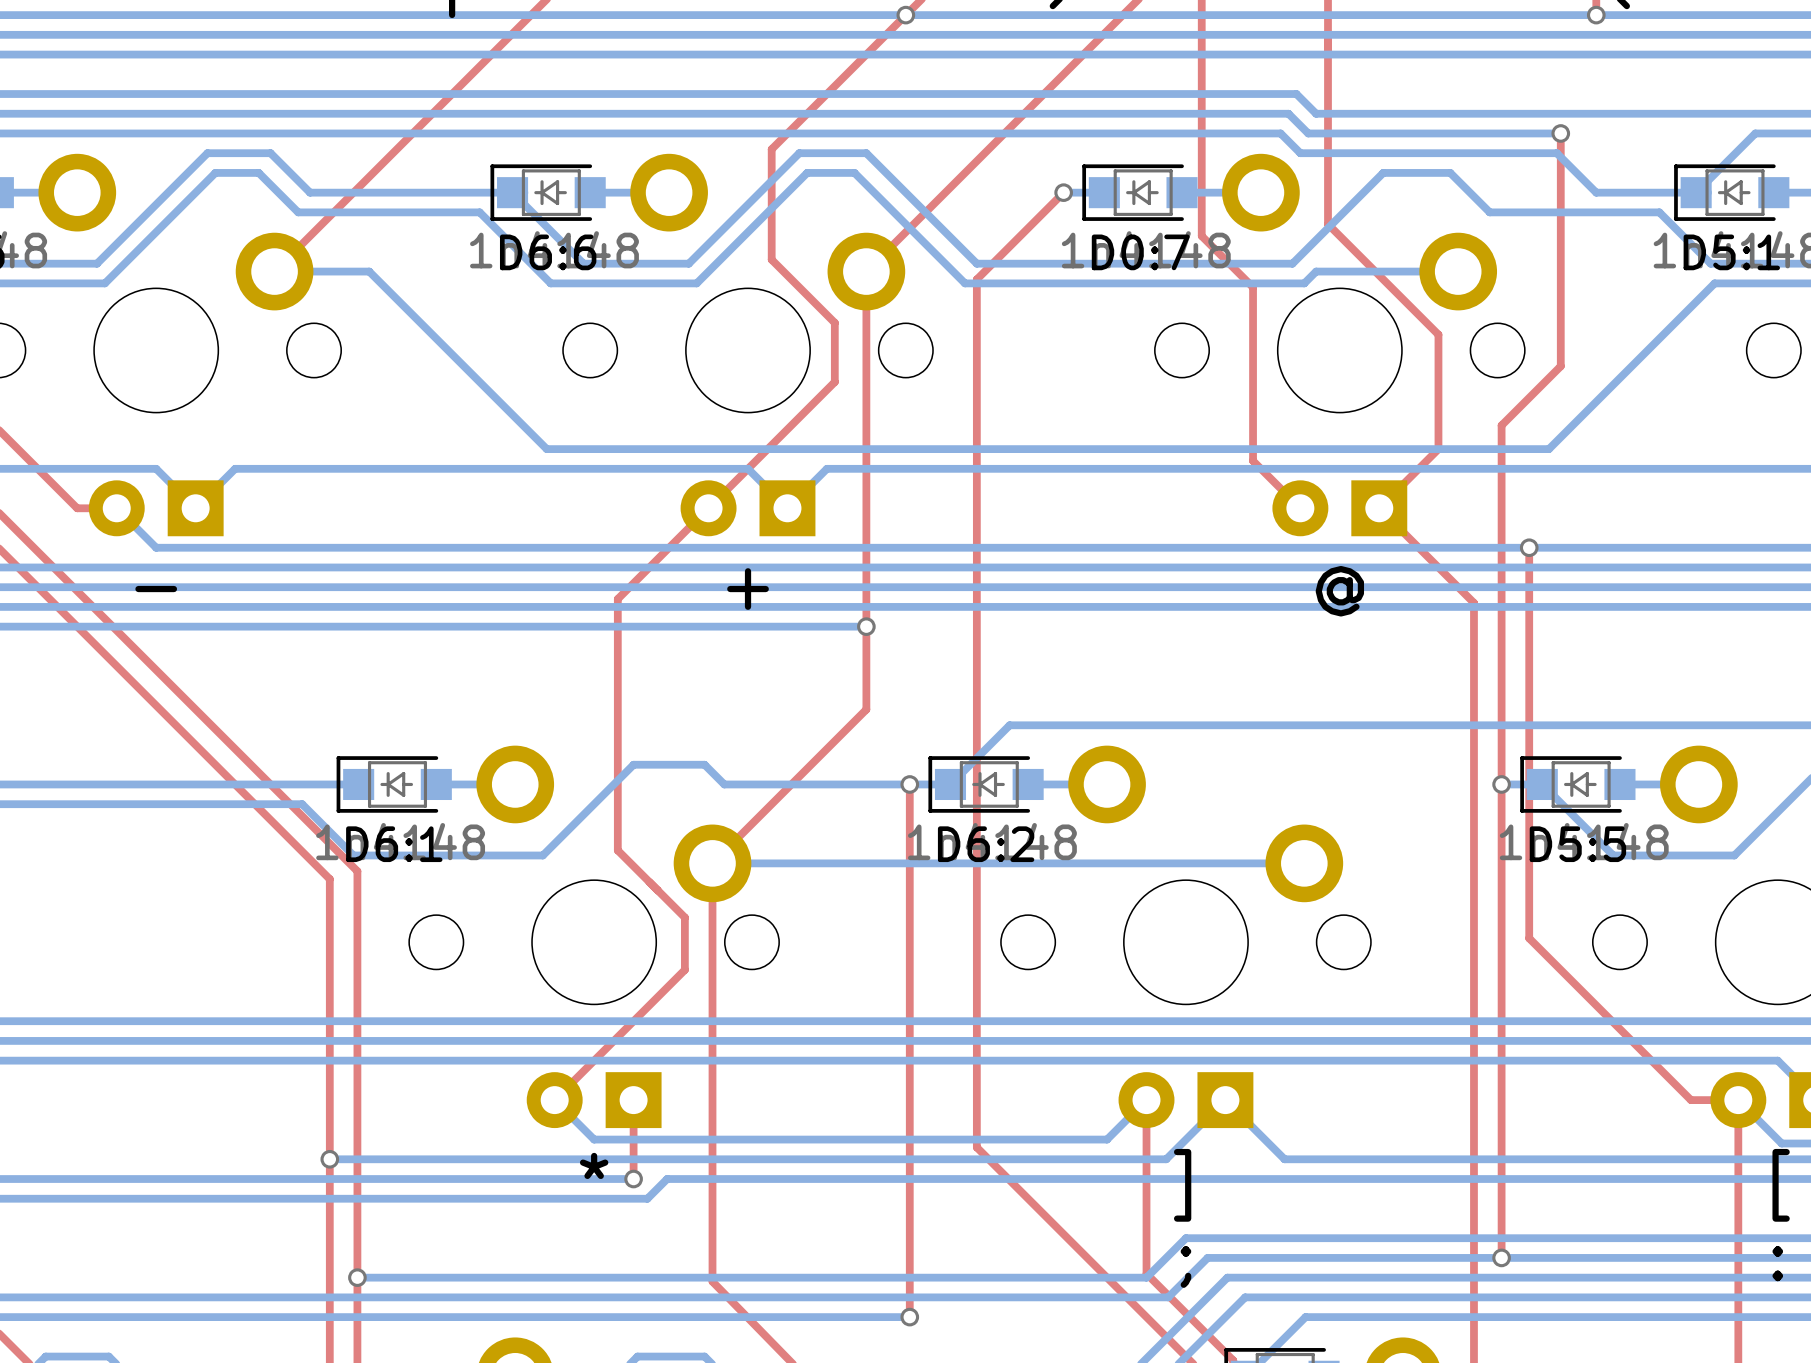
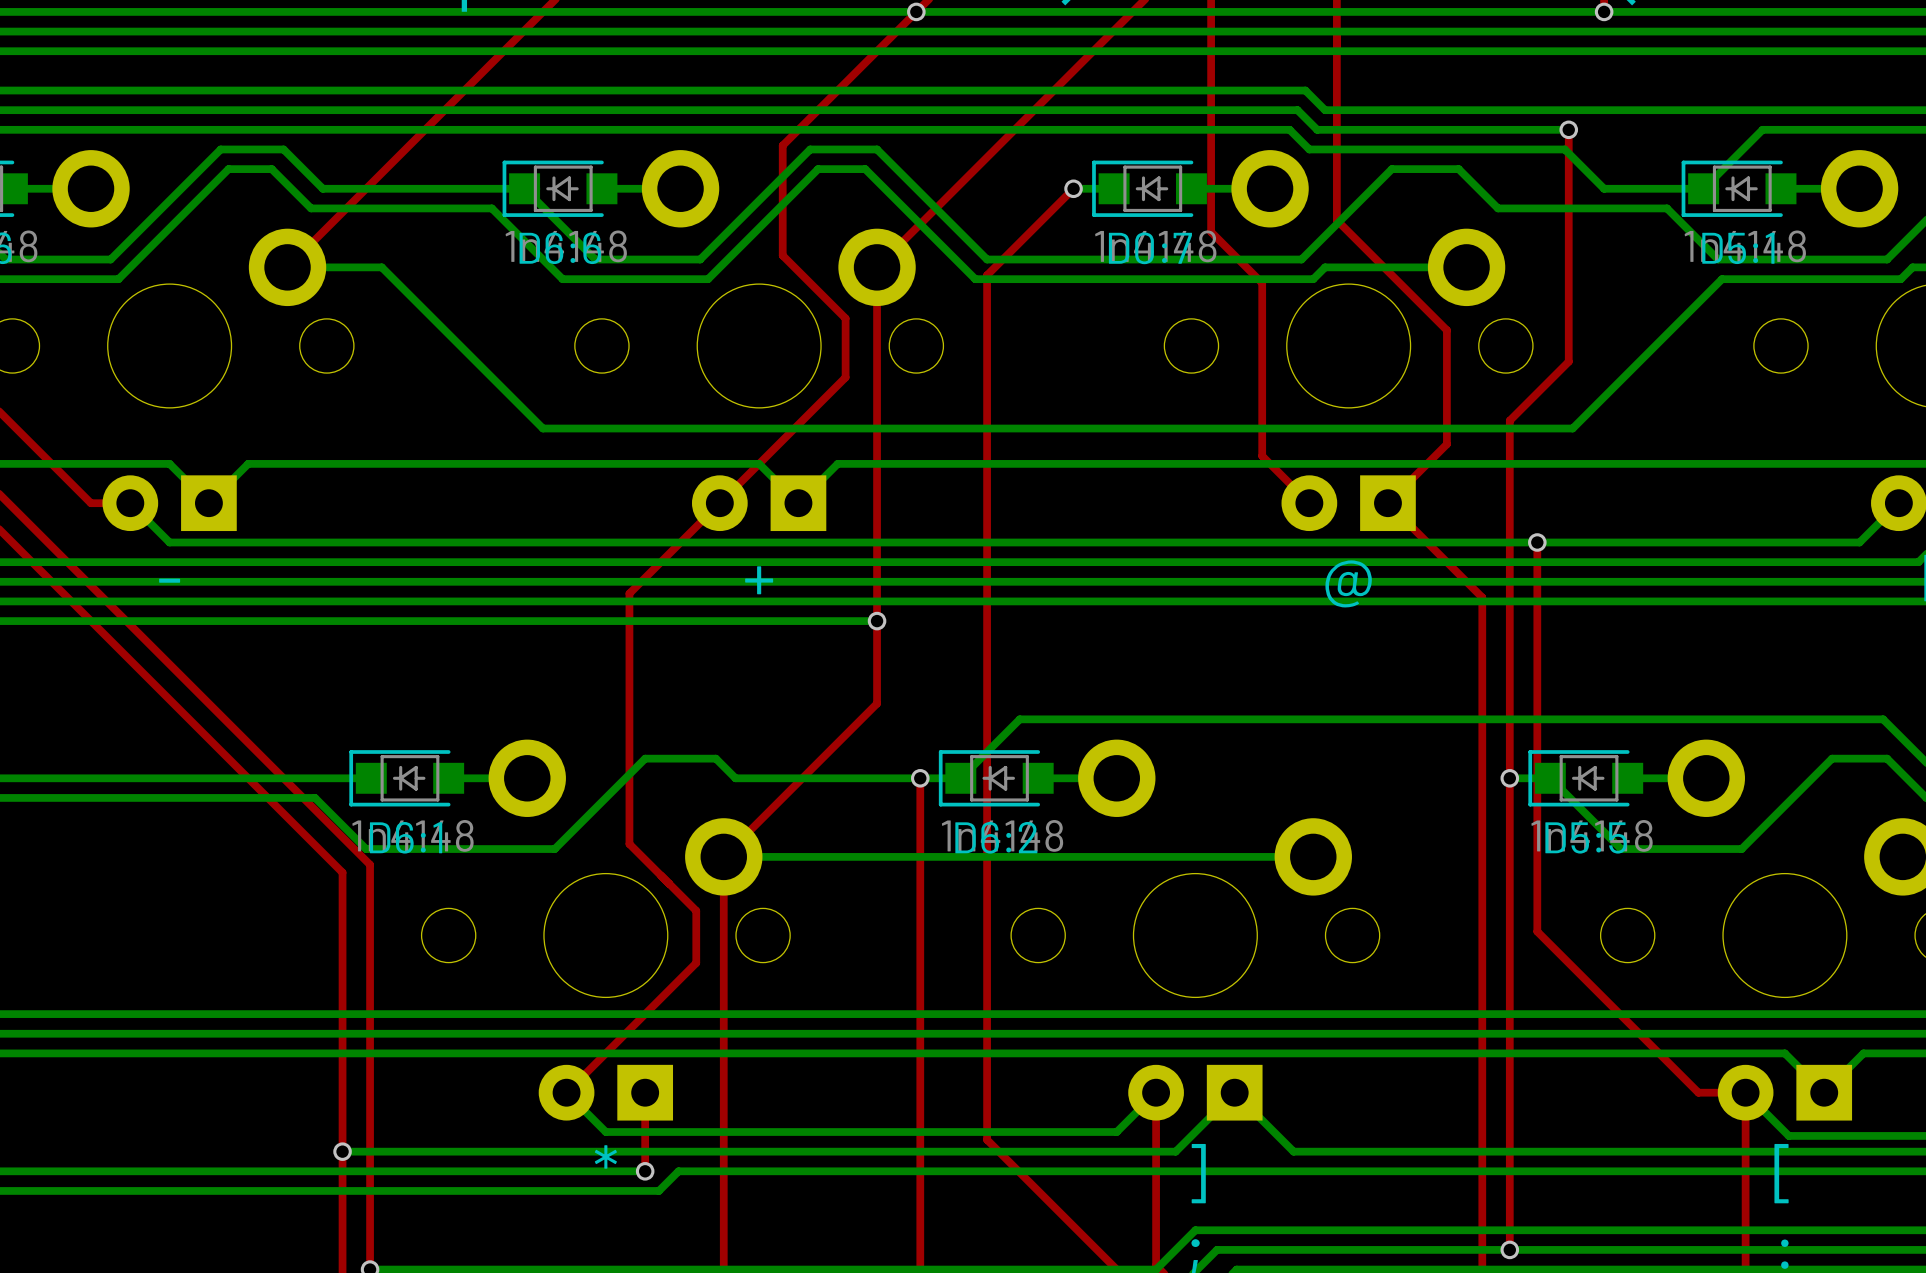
bottom track: (1564, 433) (1548, 449) (546, 449) (531, 433) -> (1572, 428) (542, 428)

